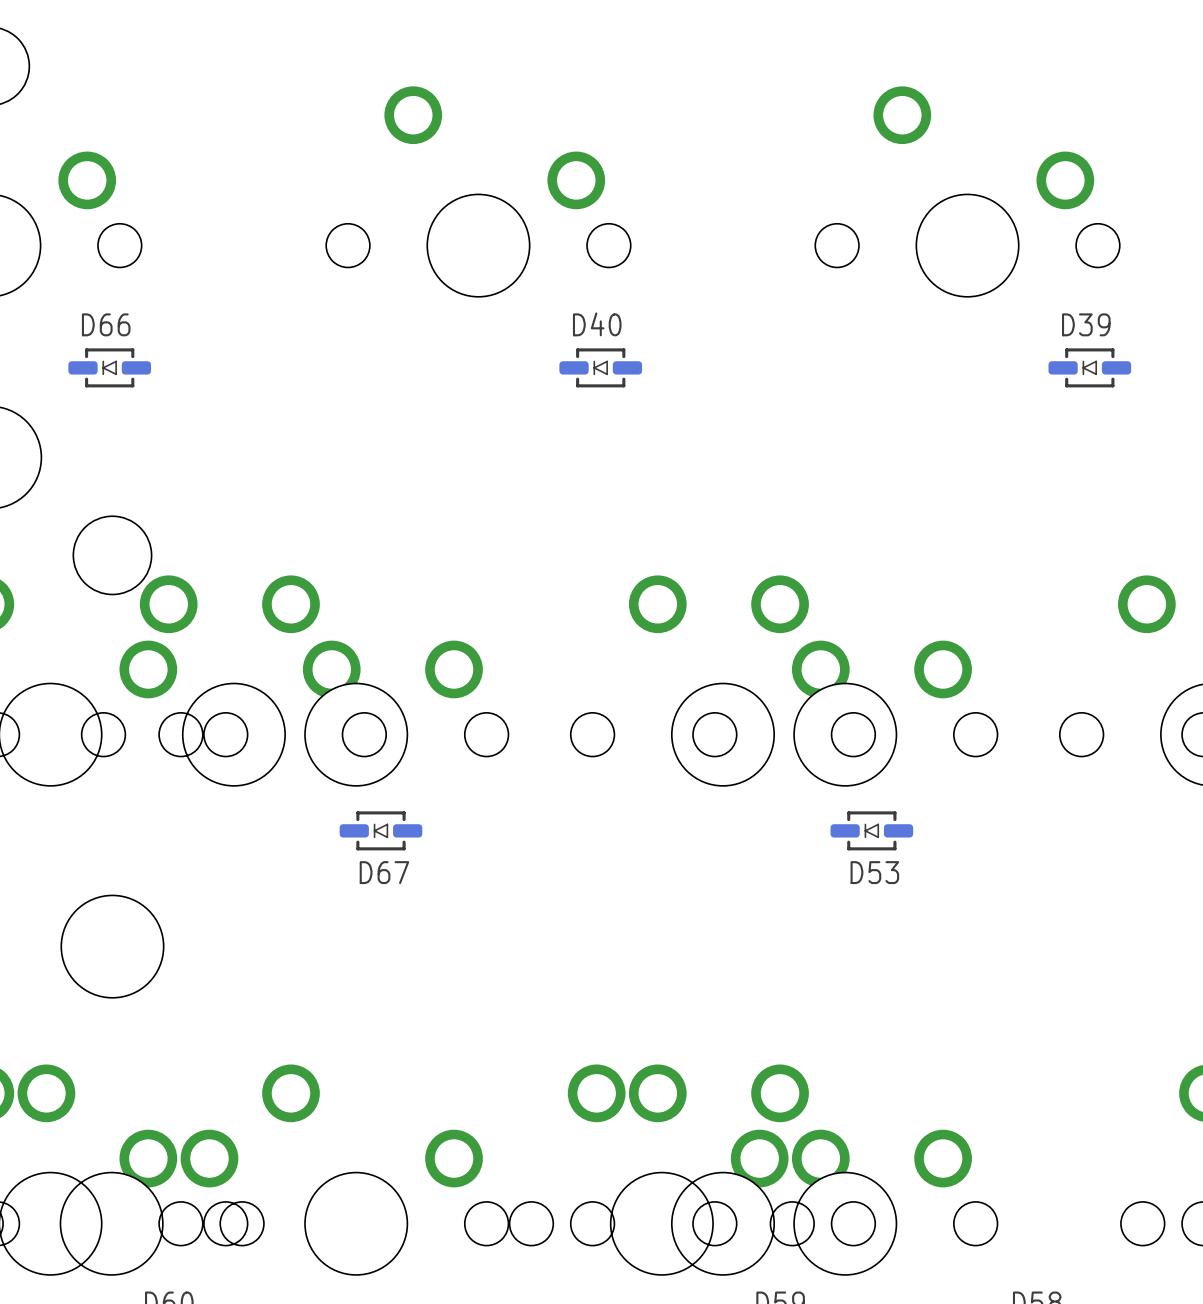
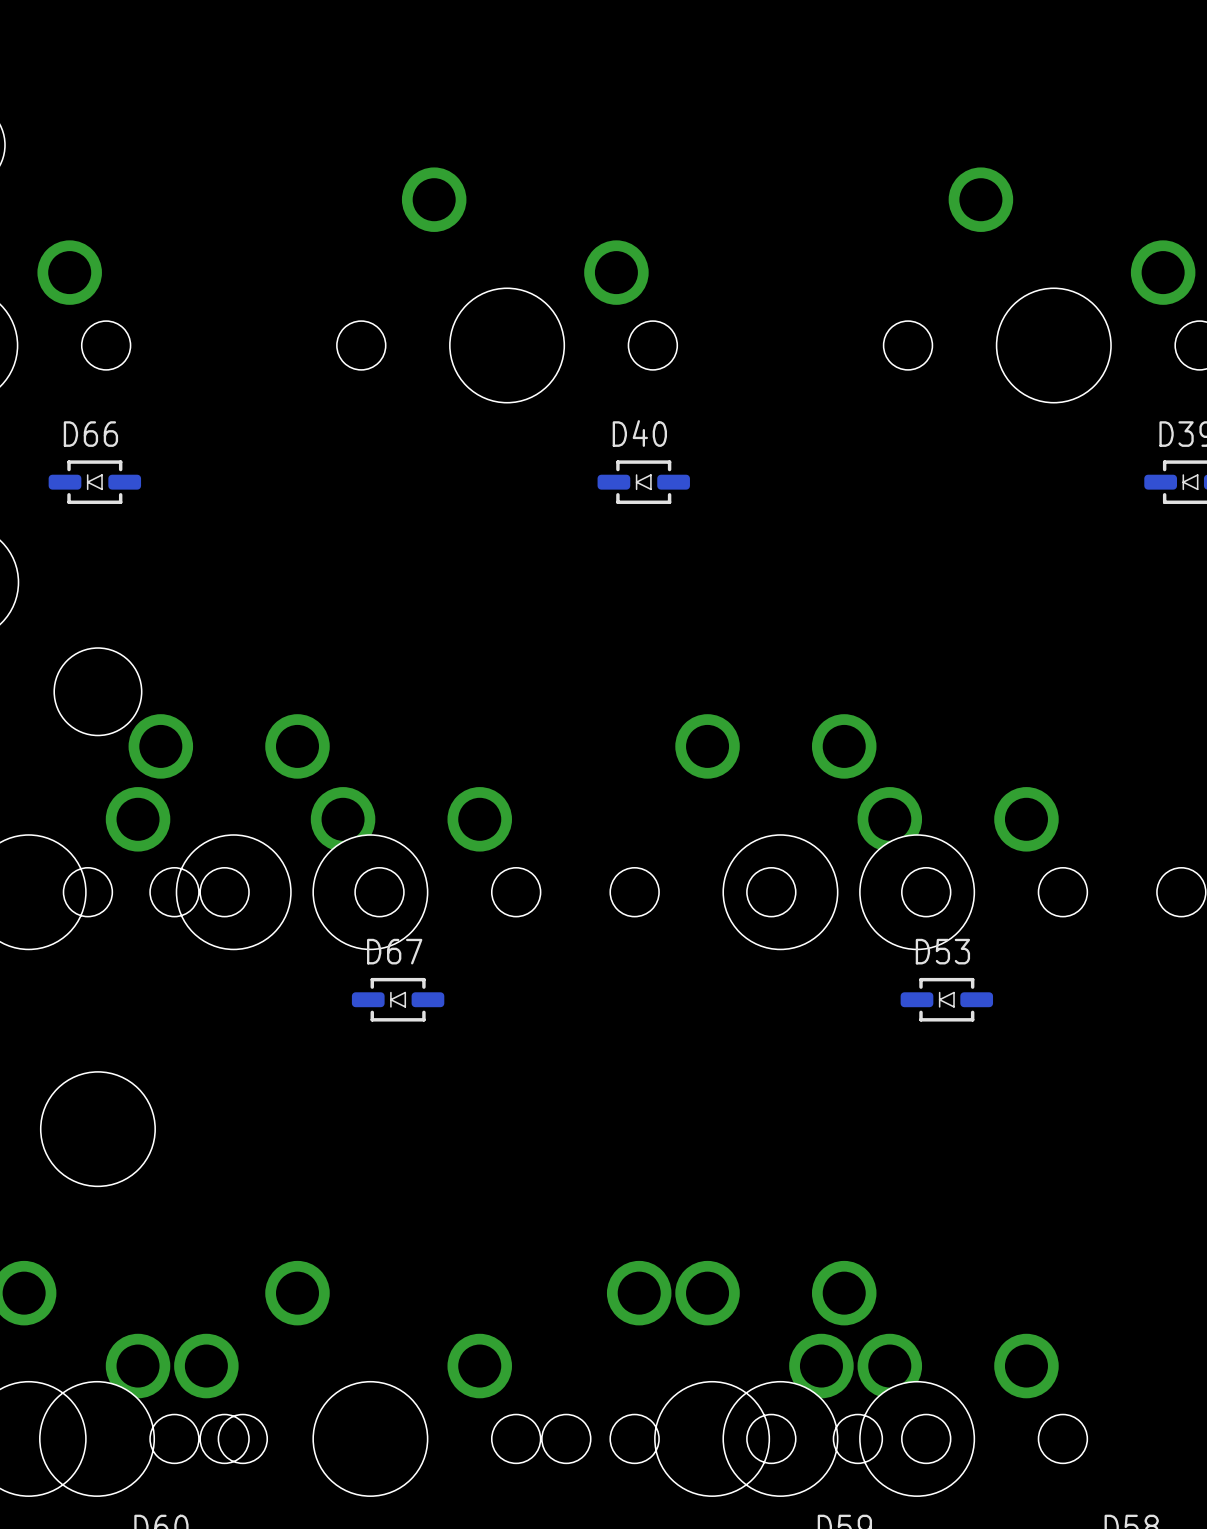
D67 name position: D67 (384, 872) -> D67 (394, 951)
D53 name position: D53 (874, 872) -> D53 (942, 951)

